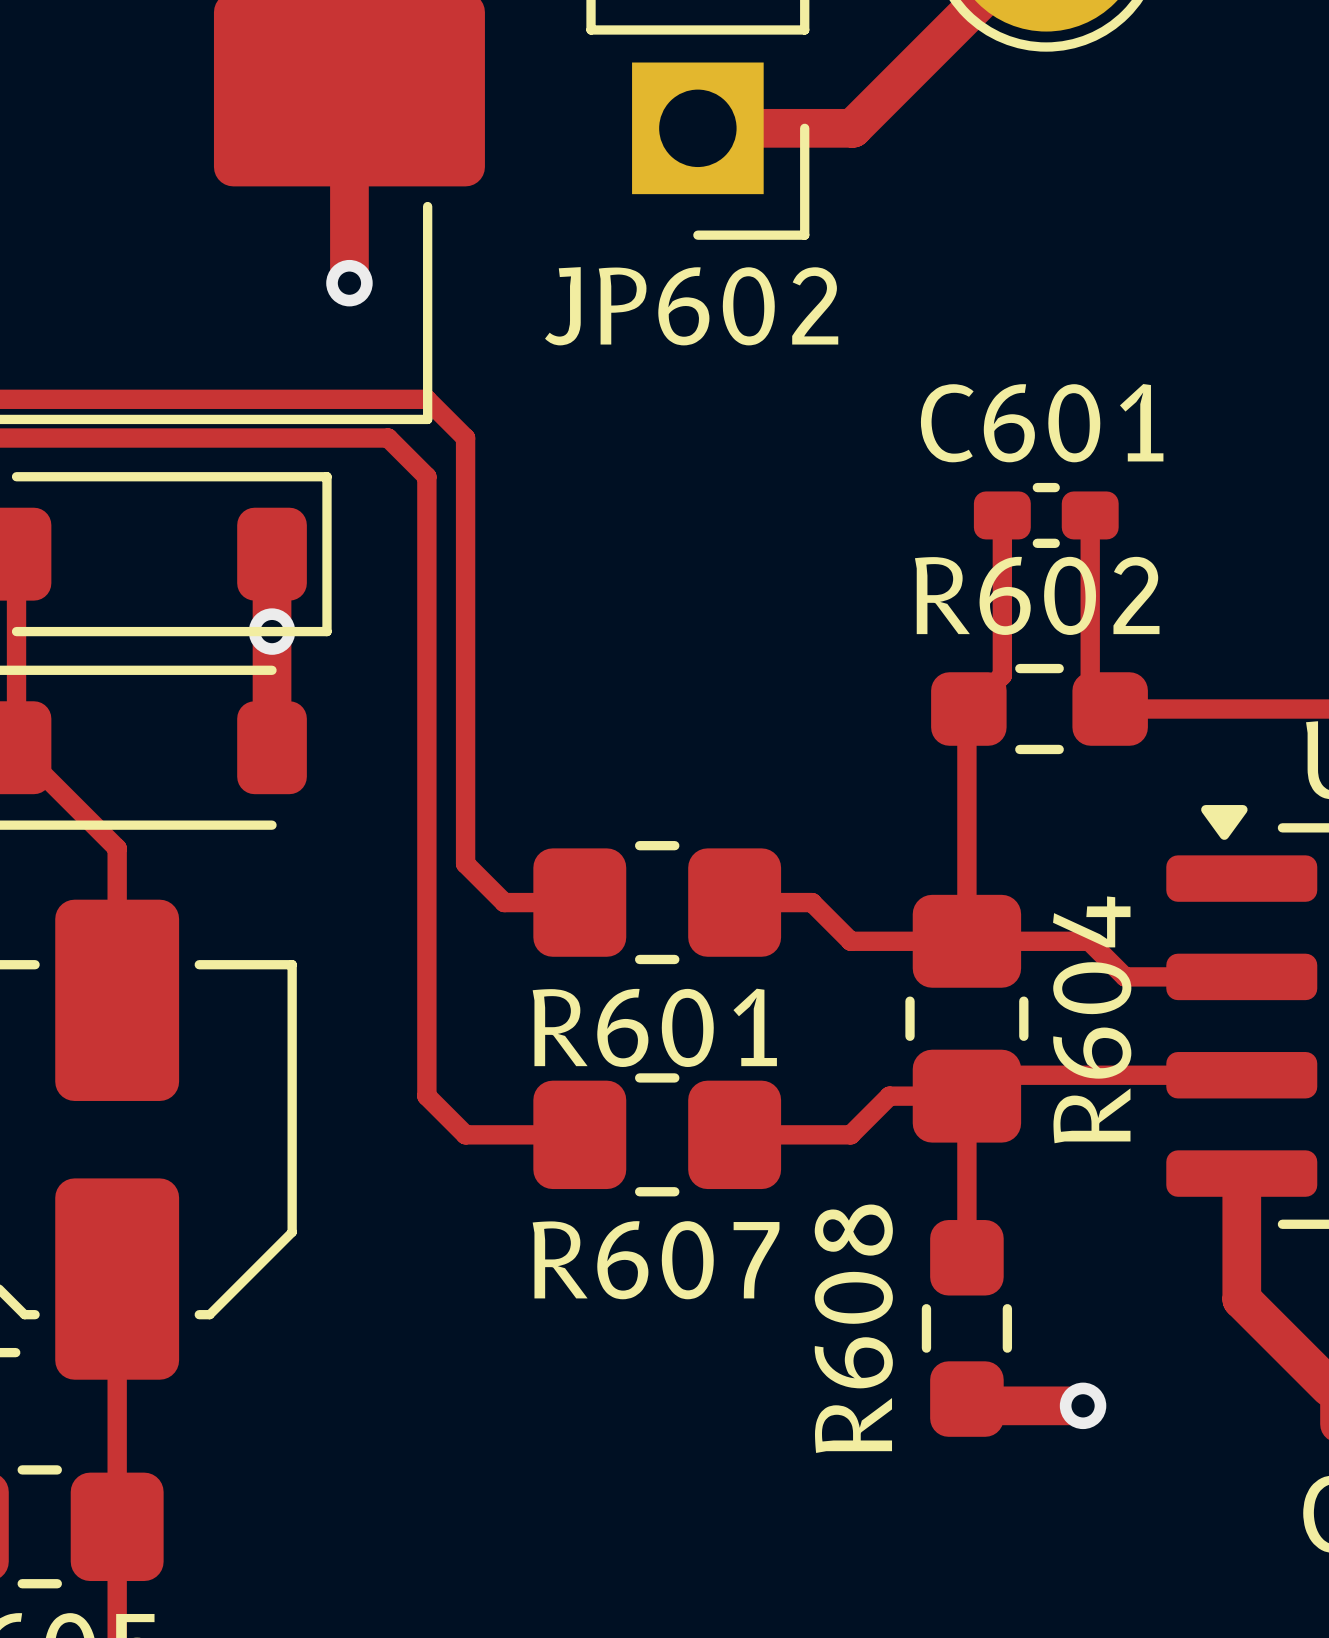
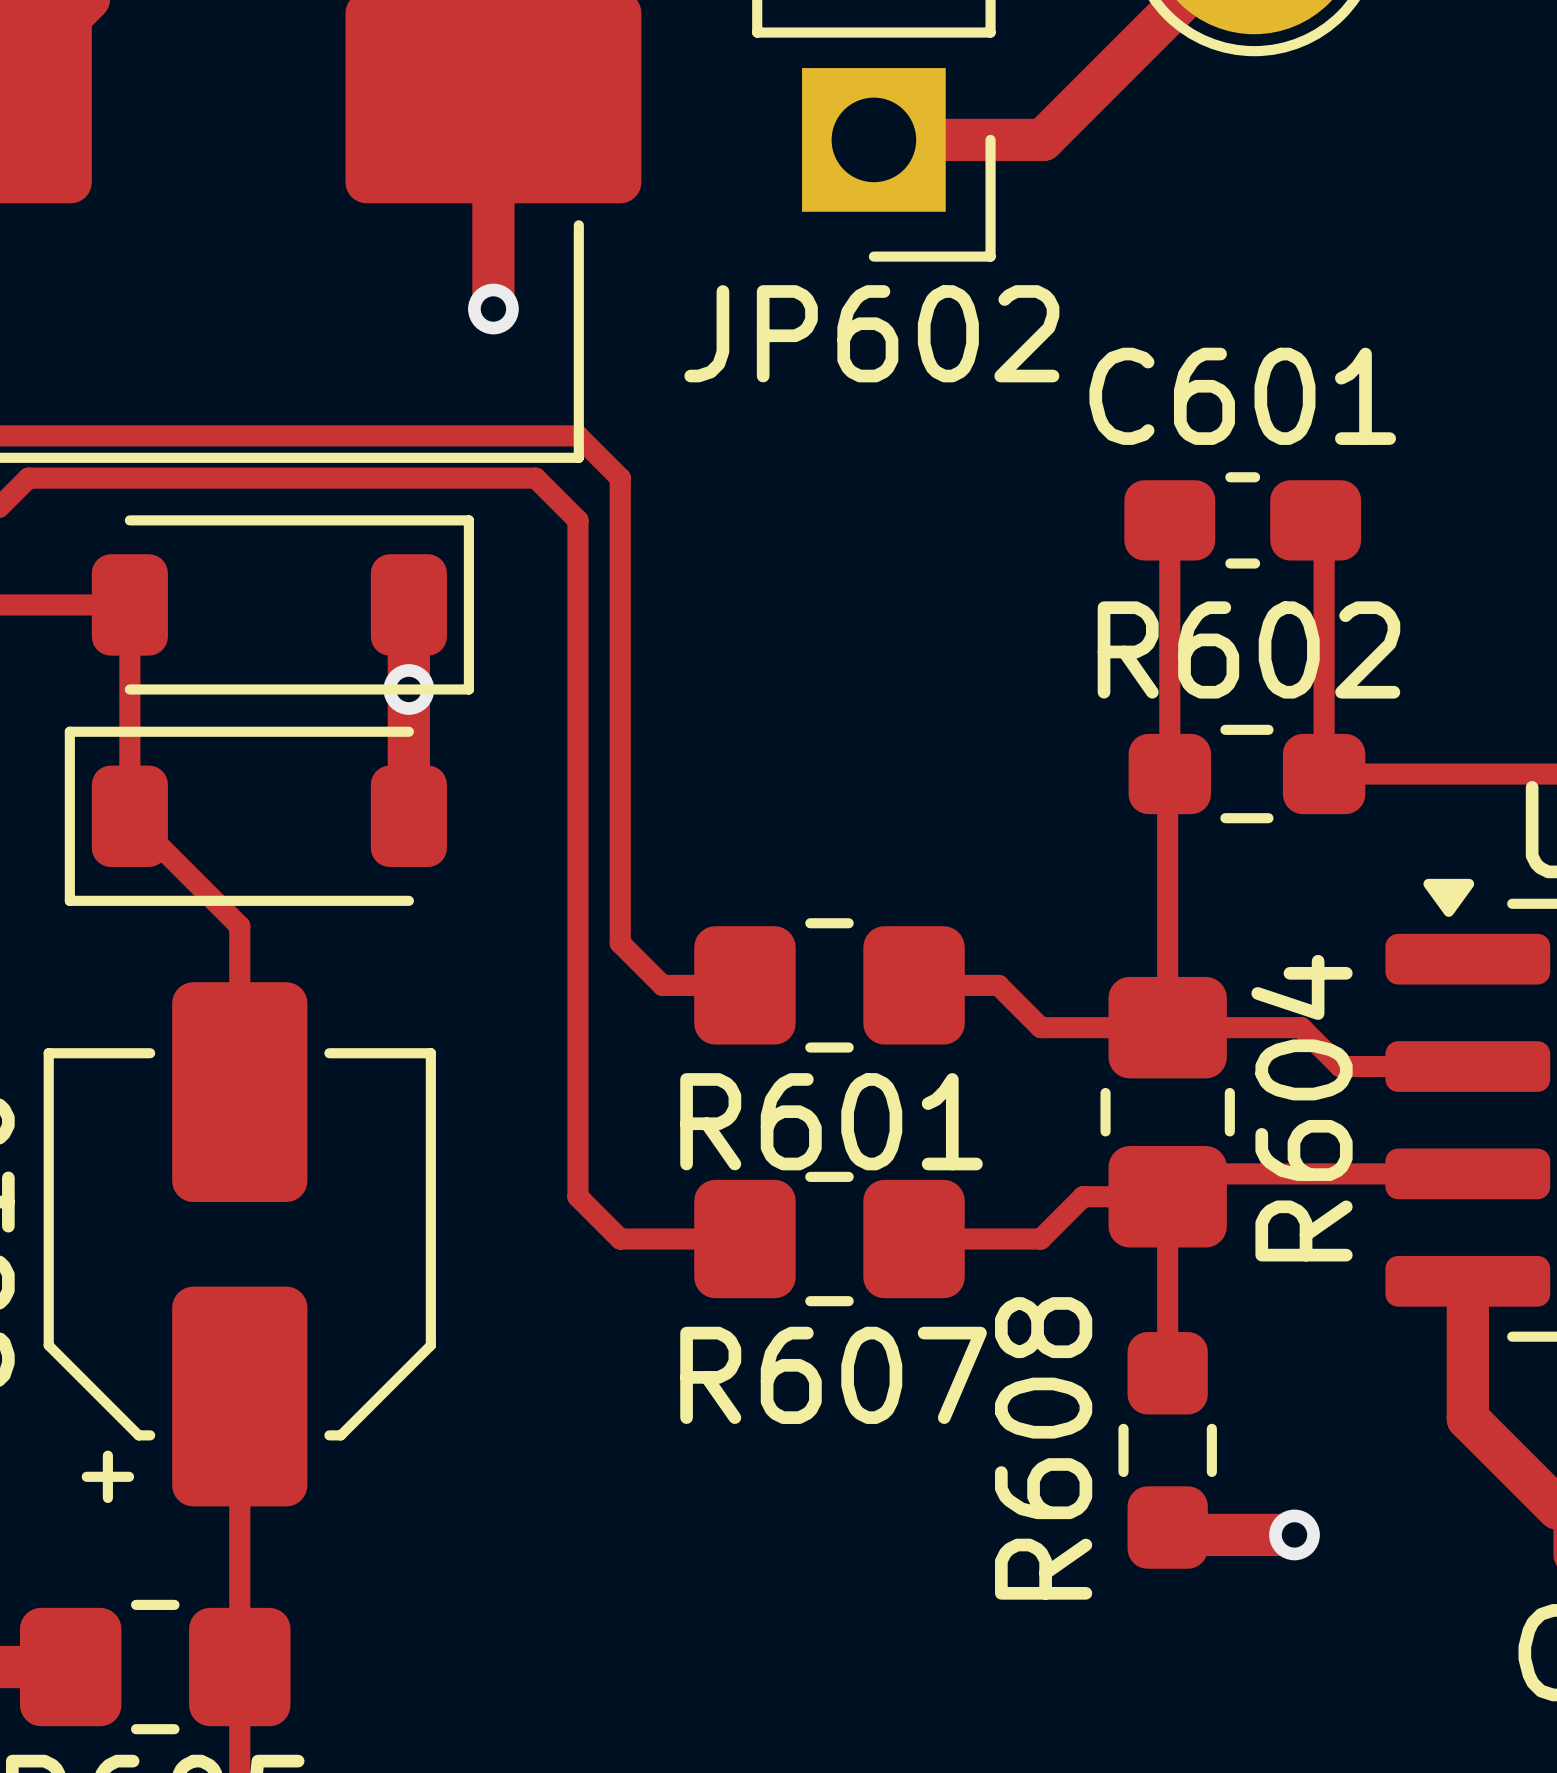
C601 name position: C601 (1042, 423) -> C601 (1242, 396)
C601 footprint: [973, 482, 1119, 548] -> [1124, 472, 1362, 569]
track: (1002, 515) (1002, 675) (968, 709) -> (1169, 520) (1169, 774)
track: (1090, 515) (1090, 689) (1110, 709) -> (1315, 520) (1324, 528) (1324, 774)

